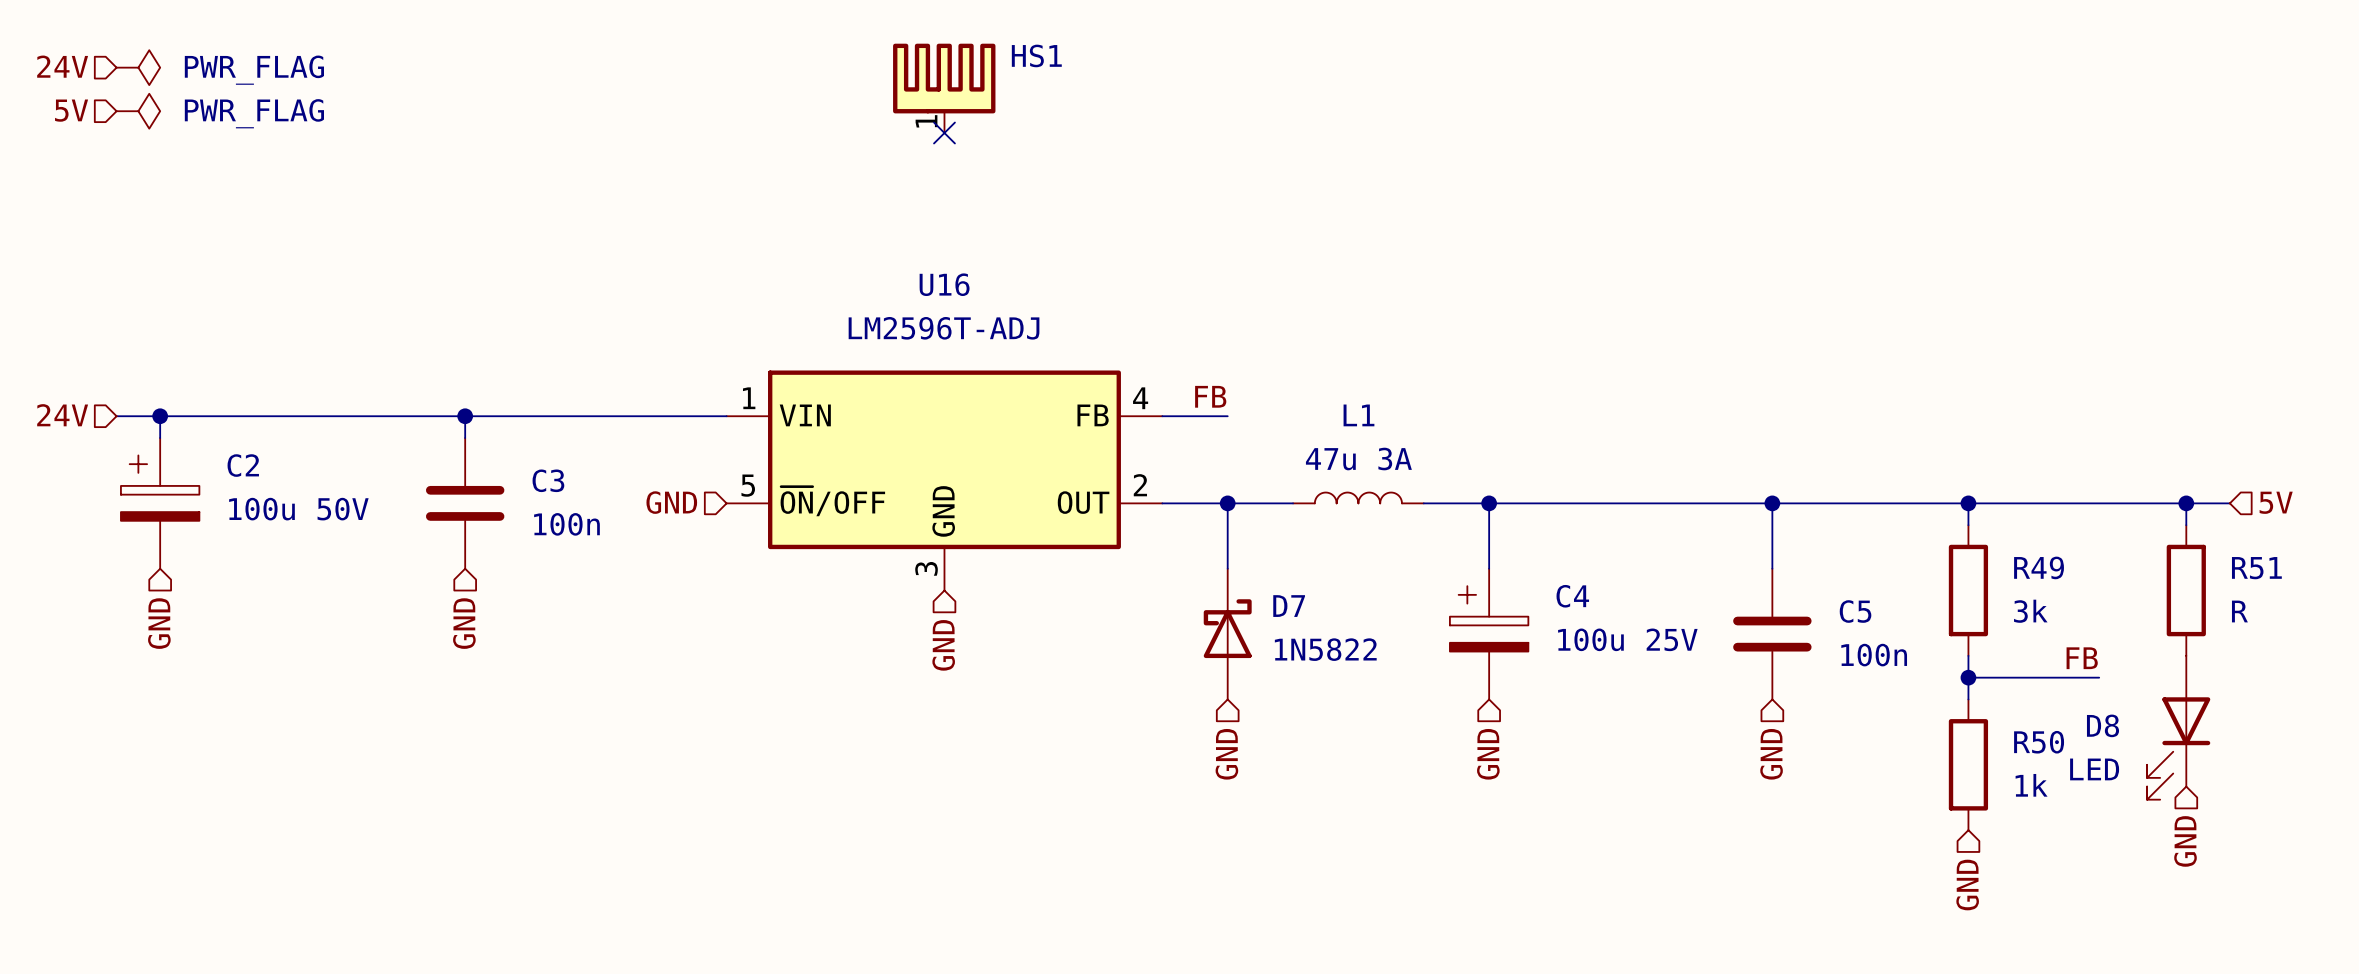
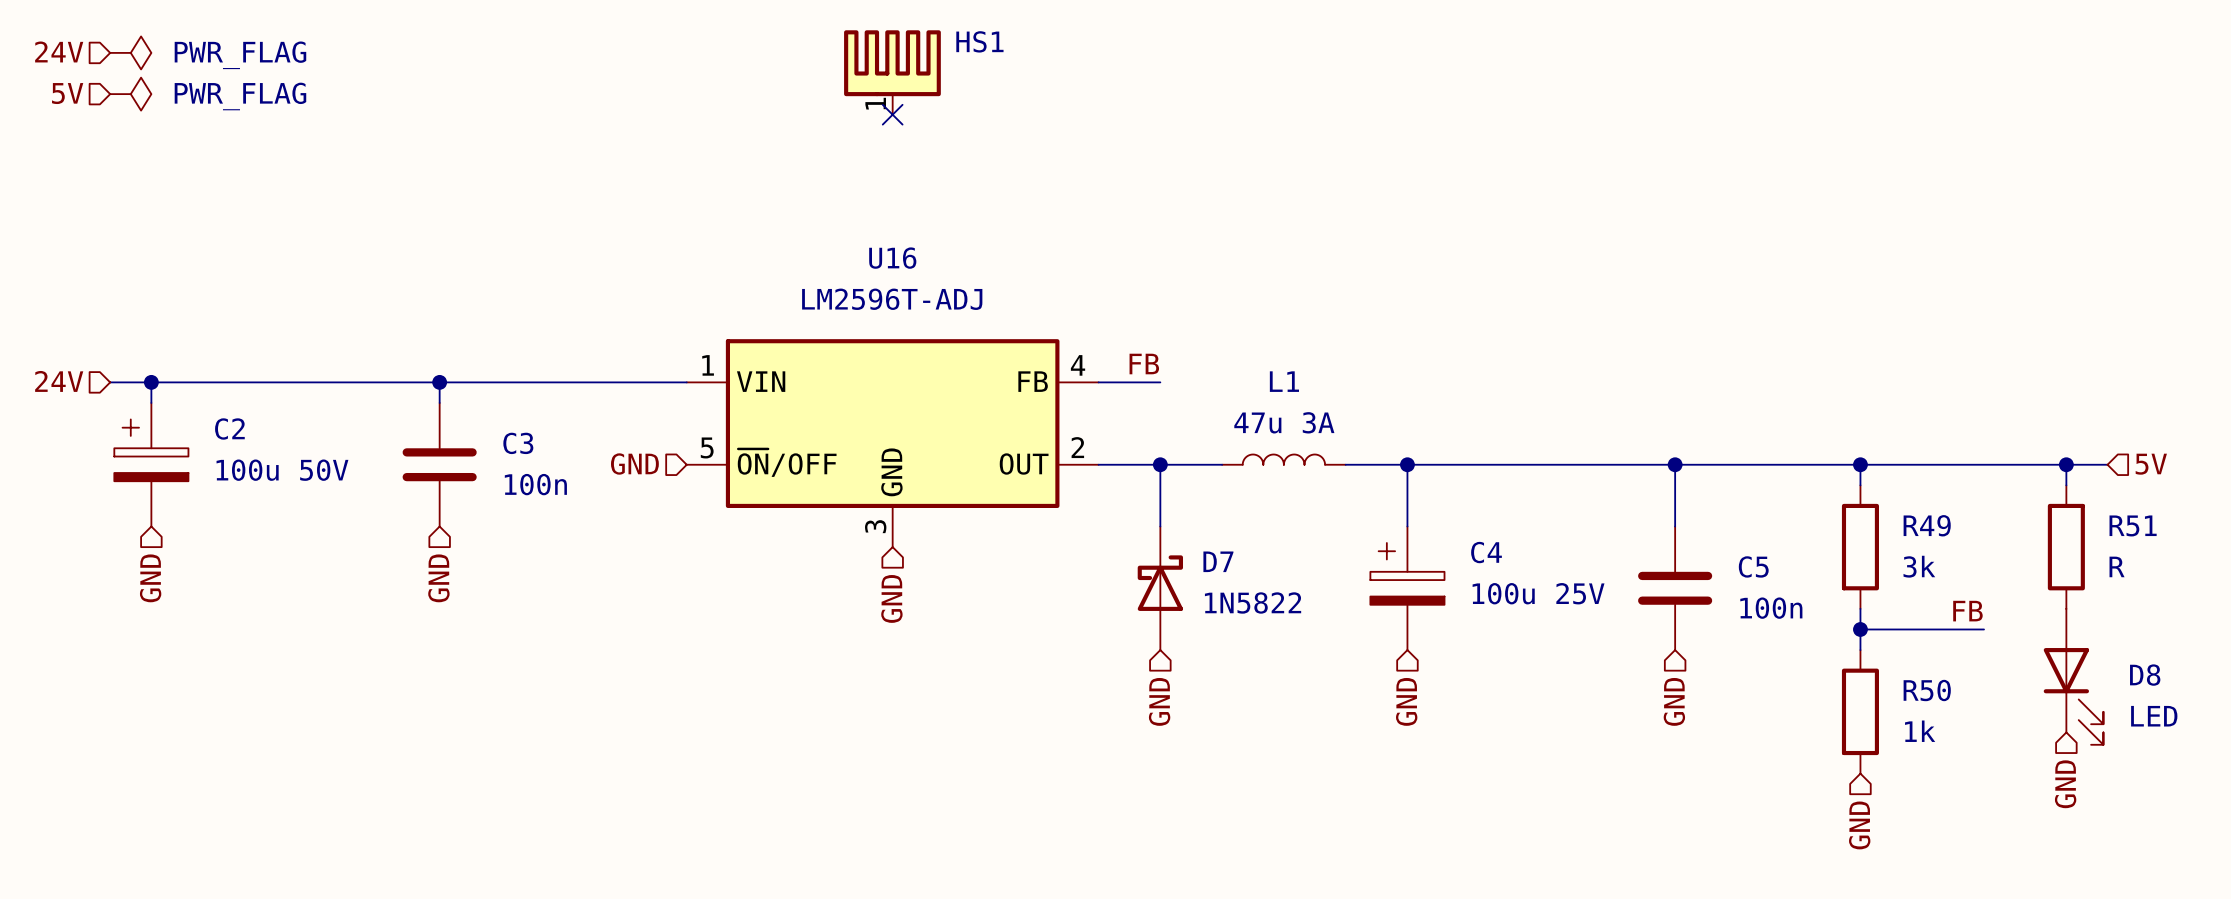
D8 flip: as is (2178, 748) -> left-right (2073, 696)

